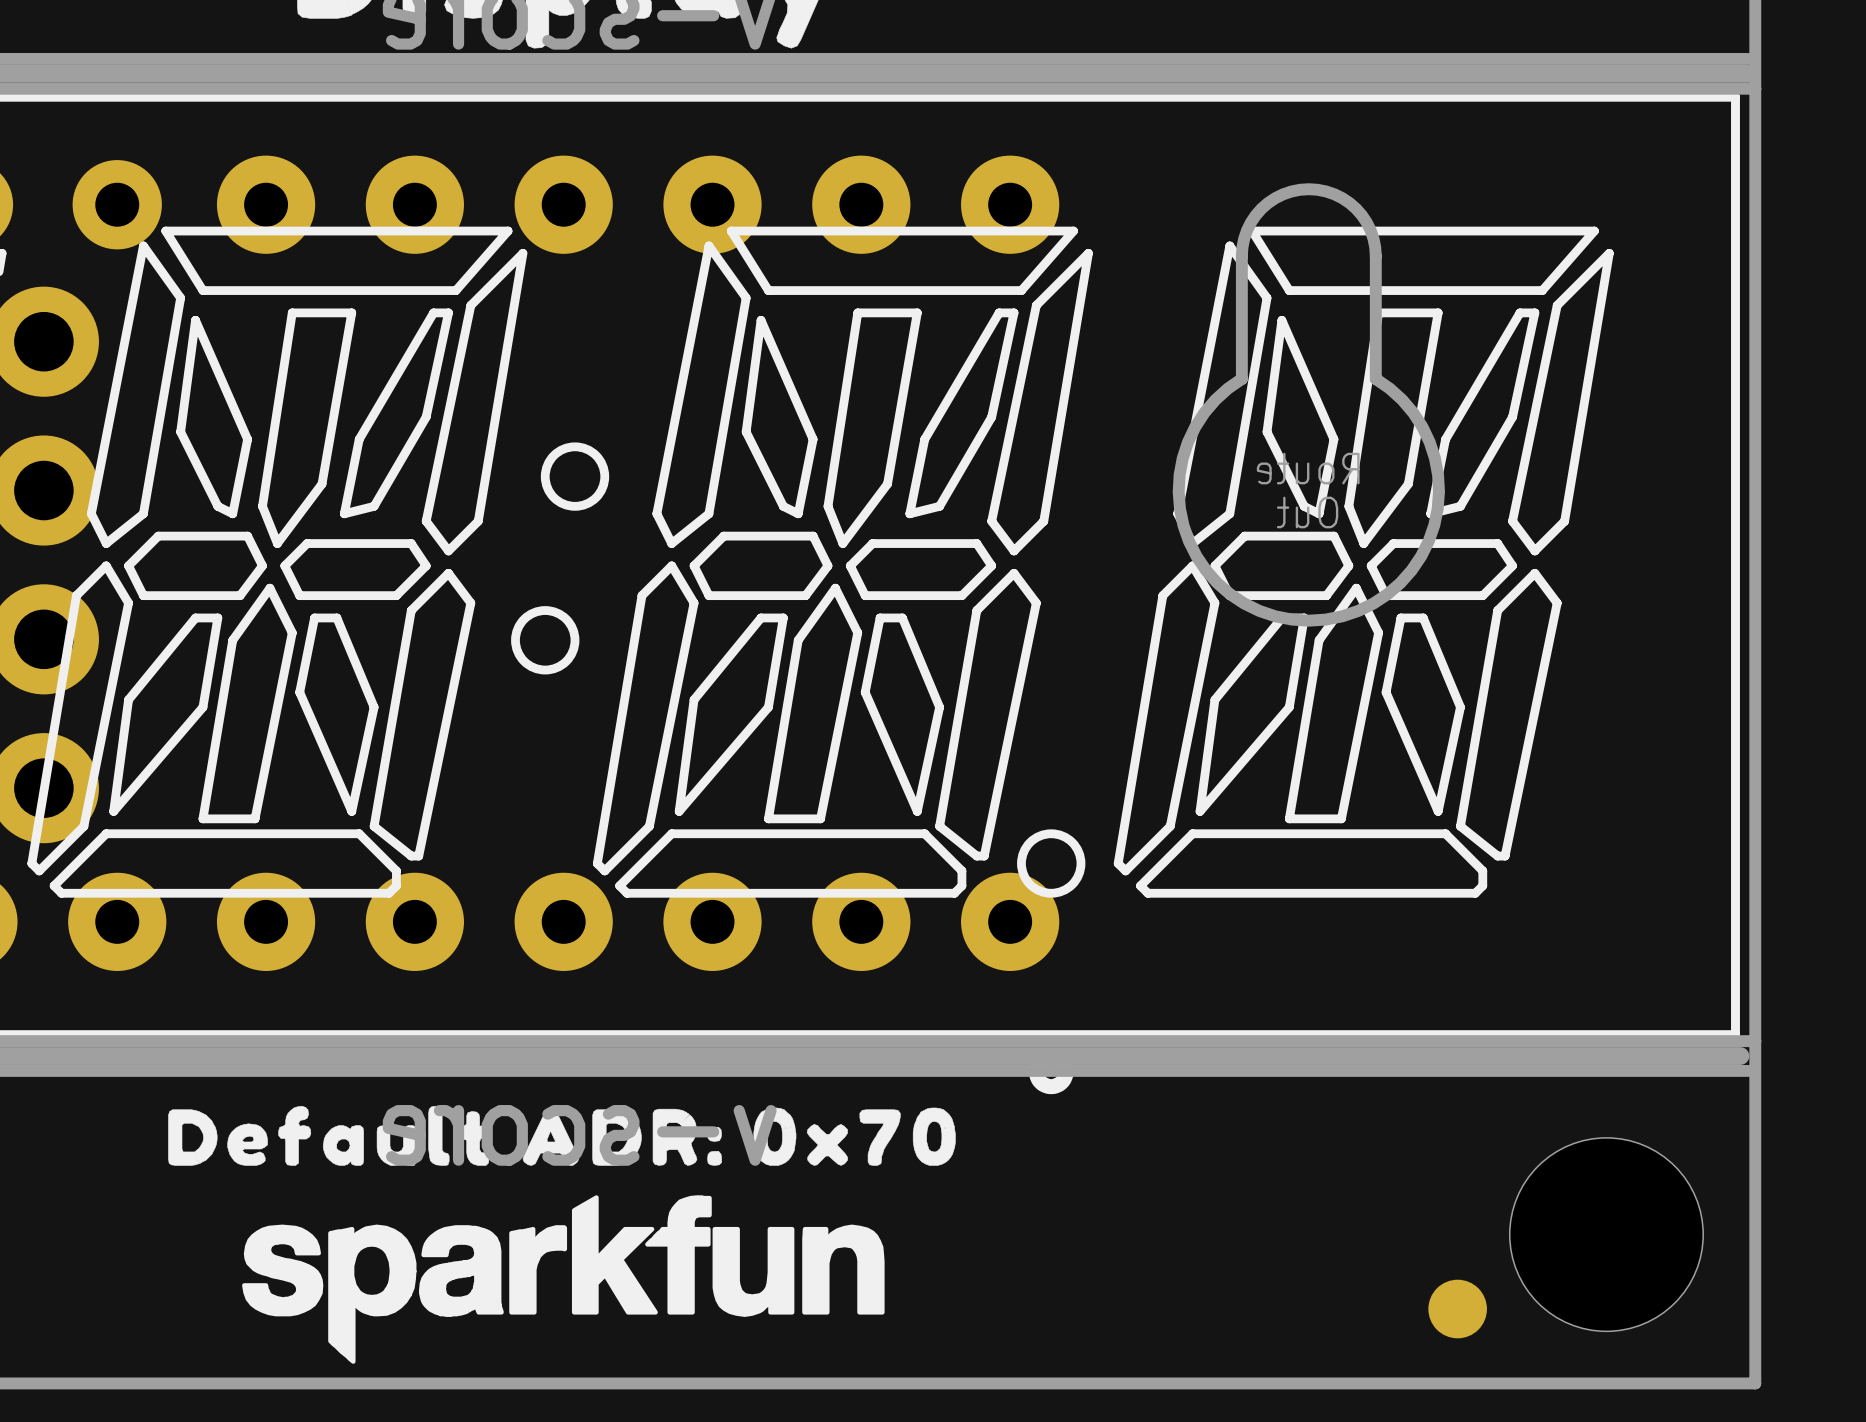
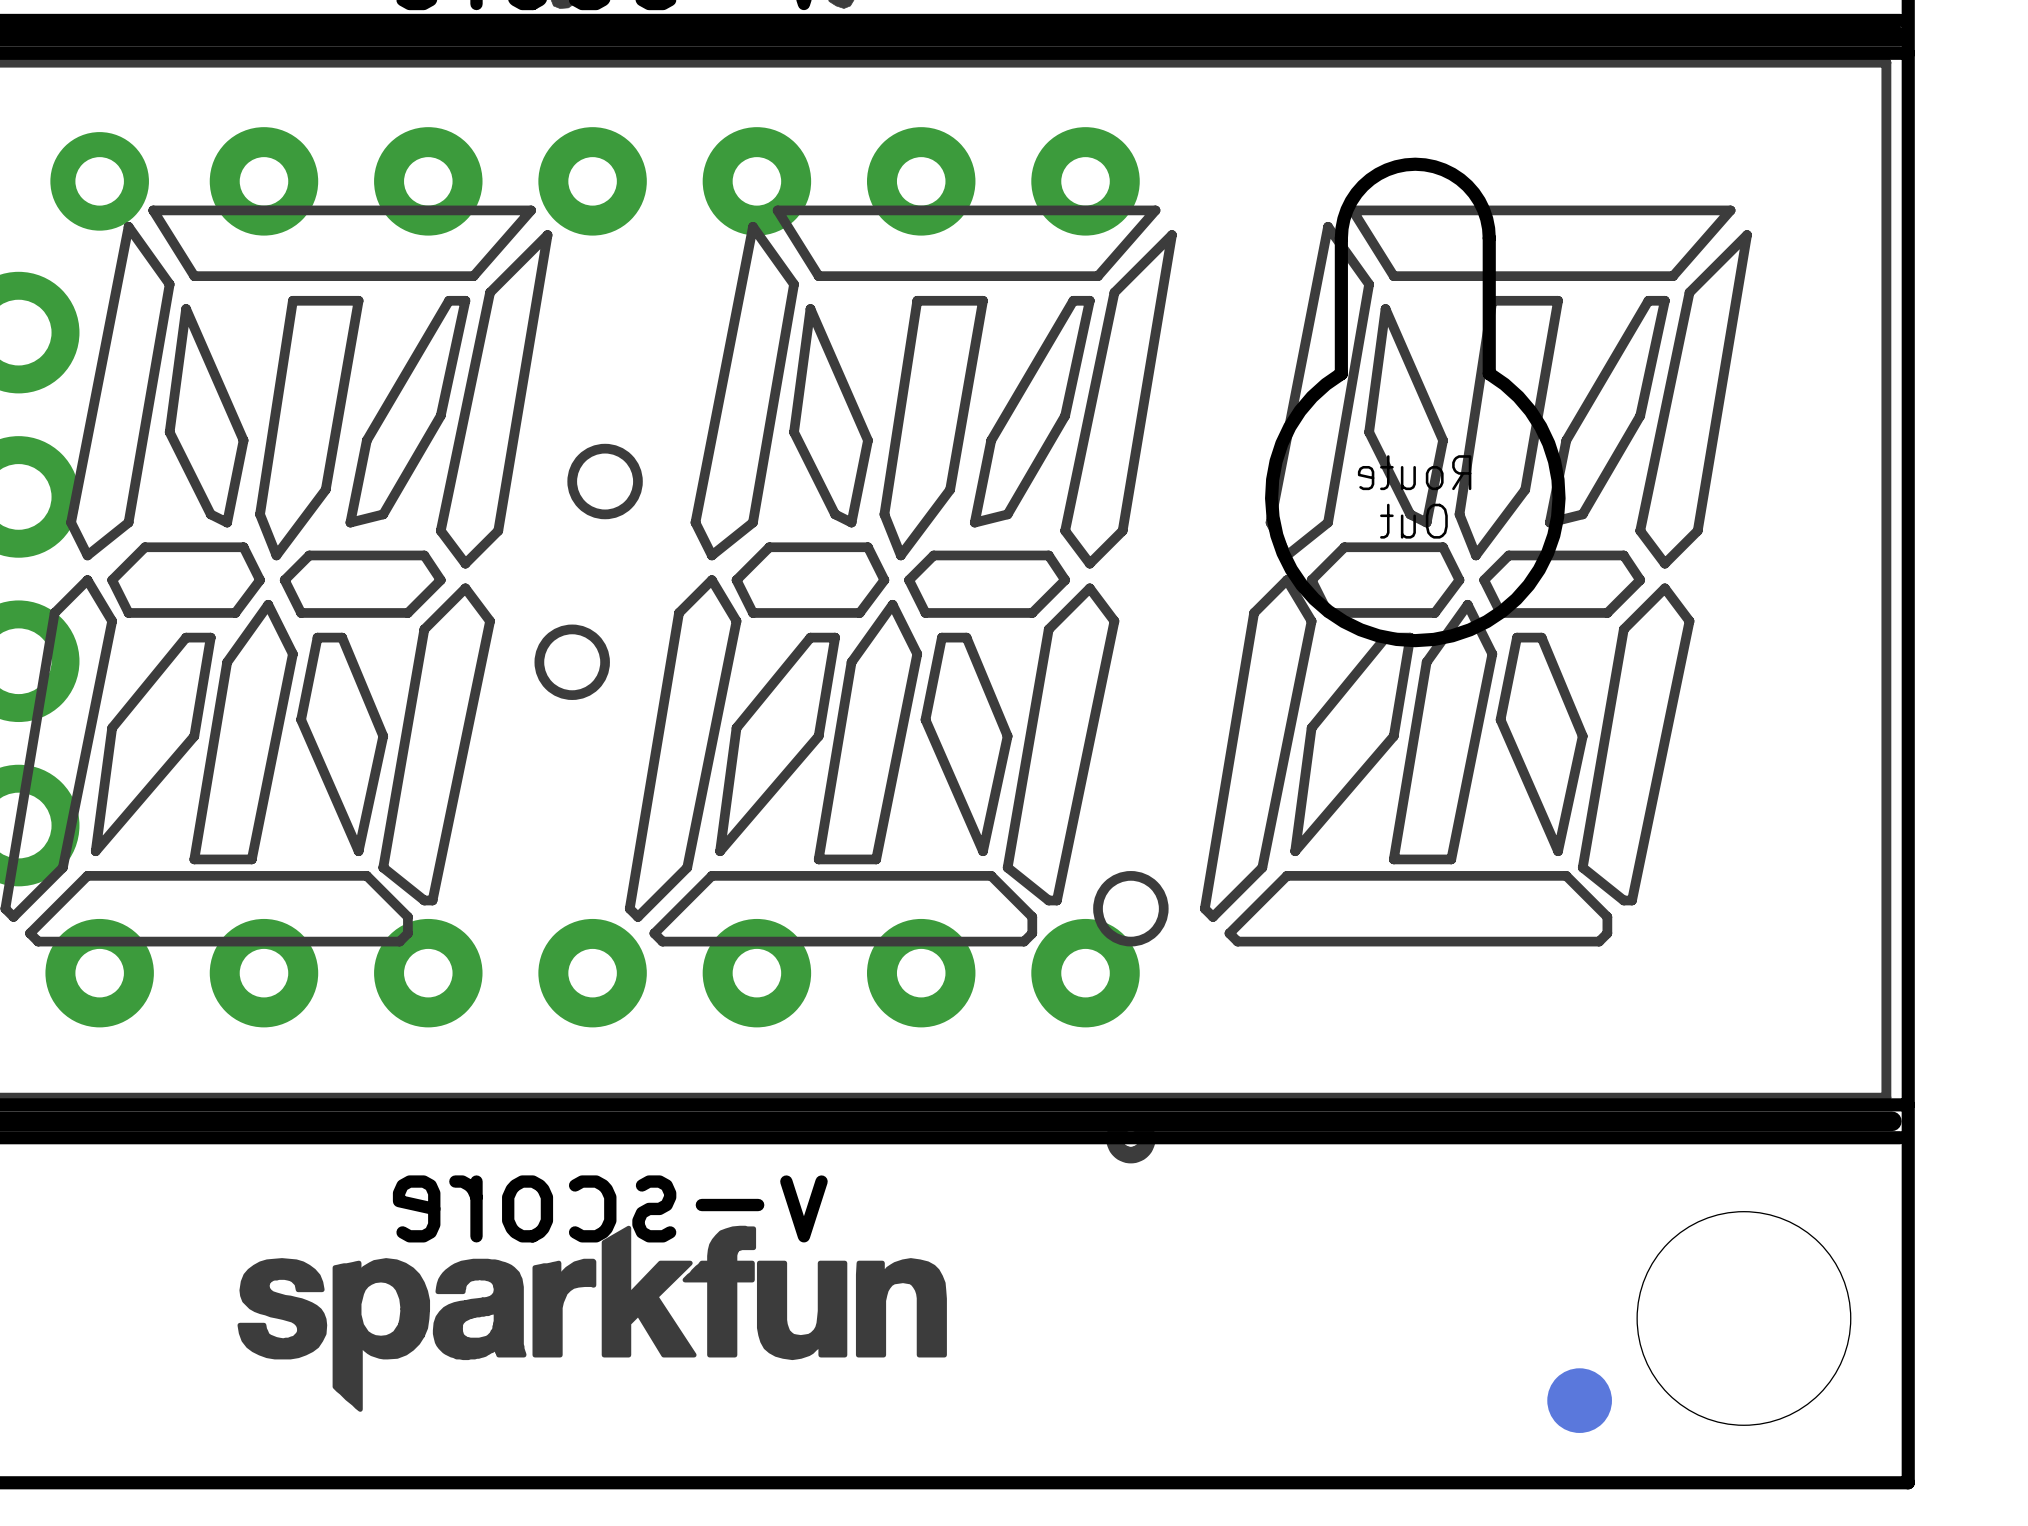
drawing: [168, 1105, 956, 1166] -> none
drawing position: (563, 1279) -> (592, 1318)

